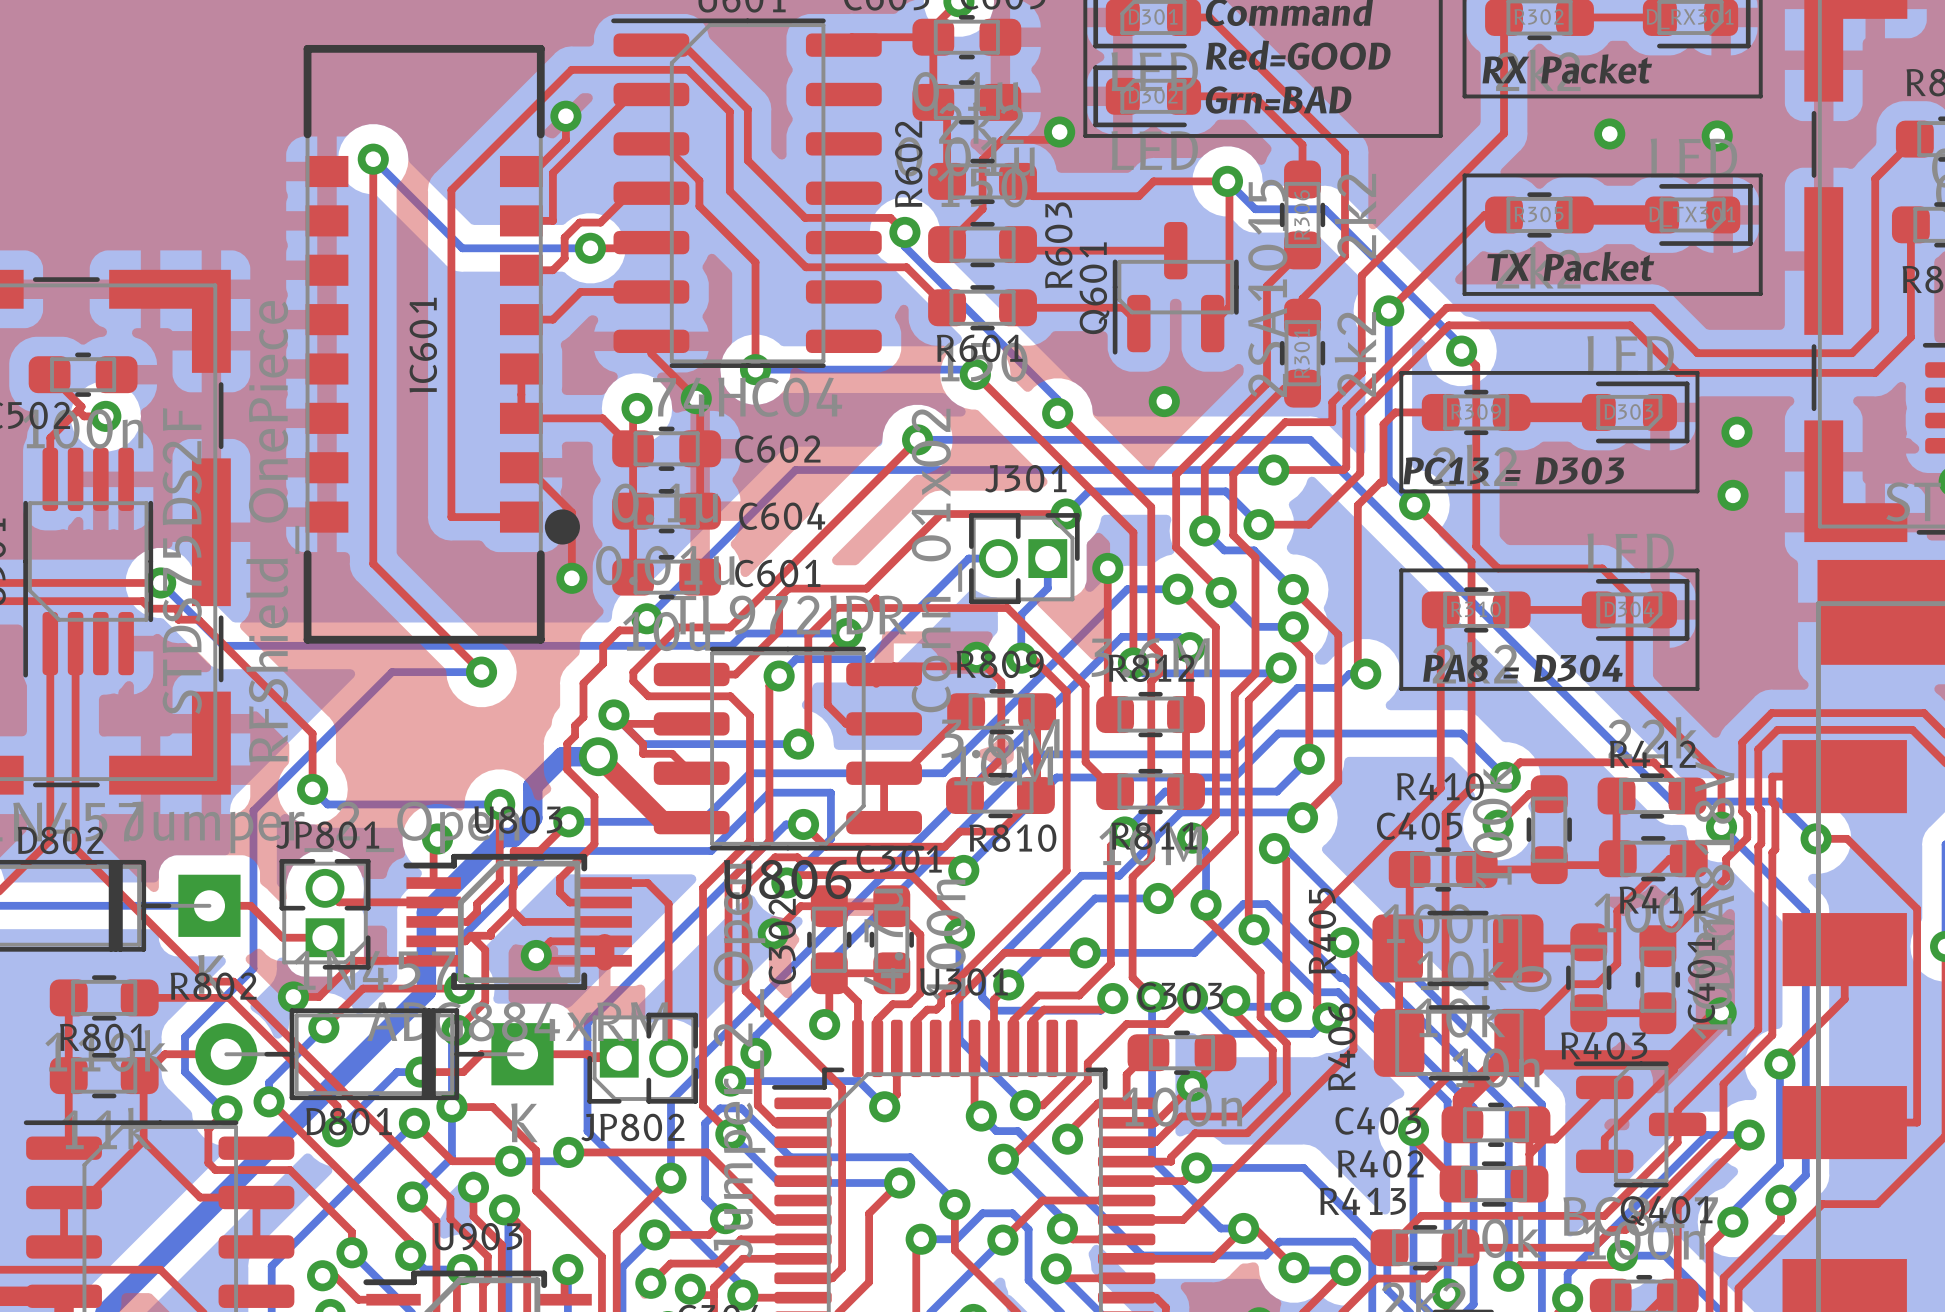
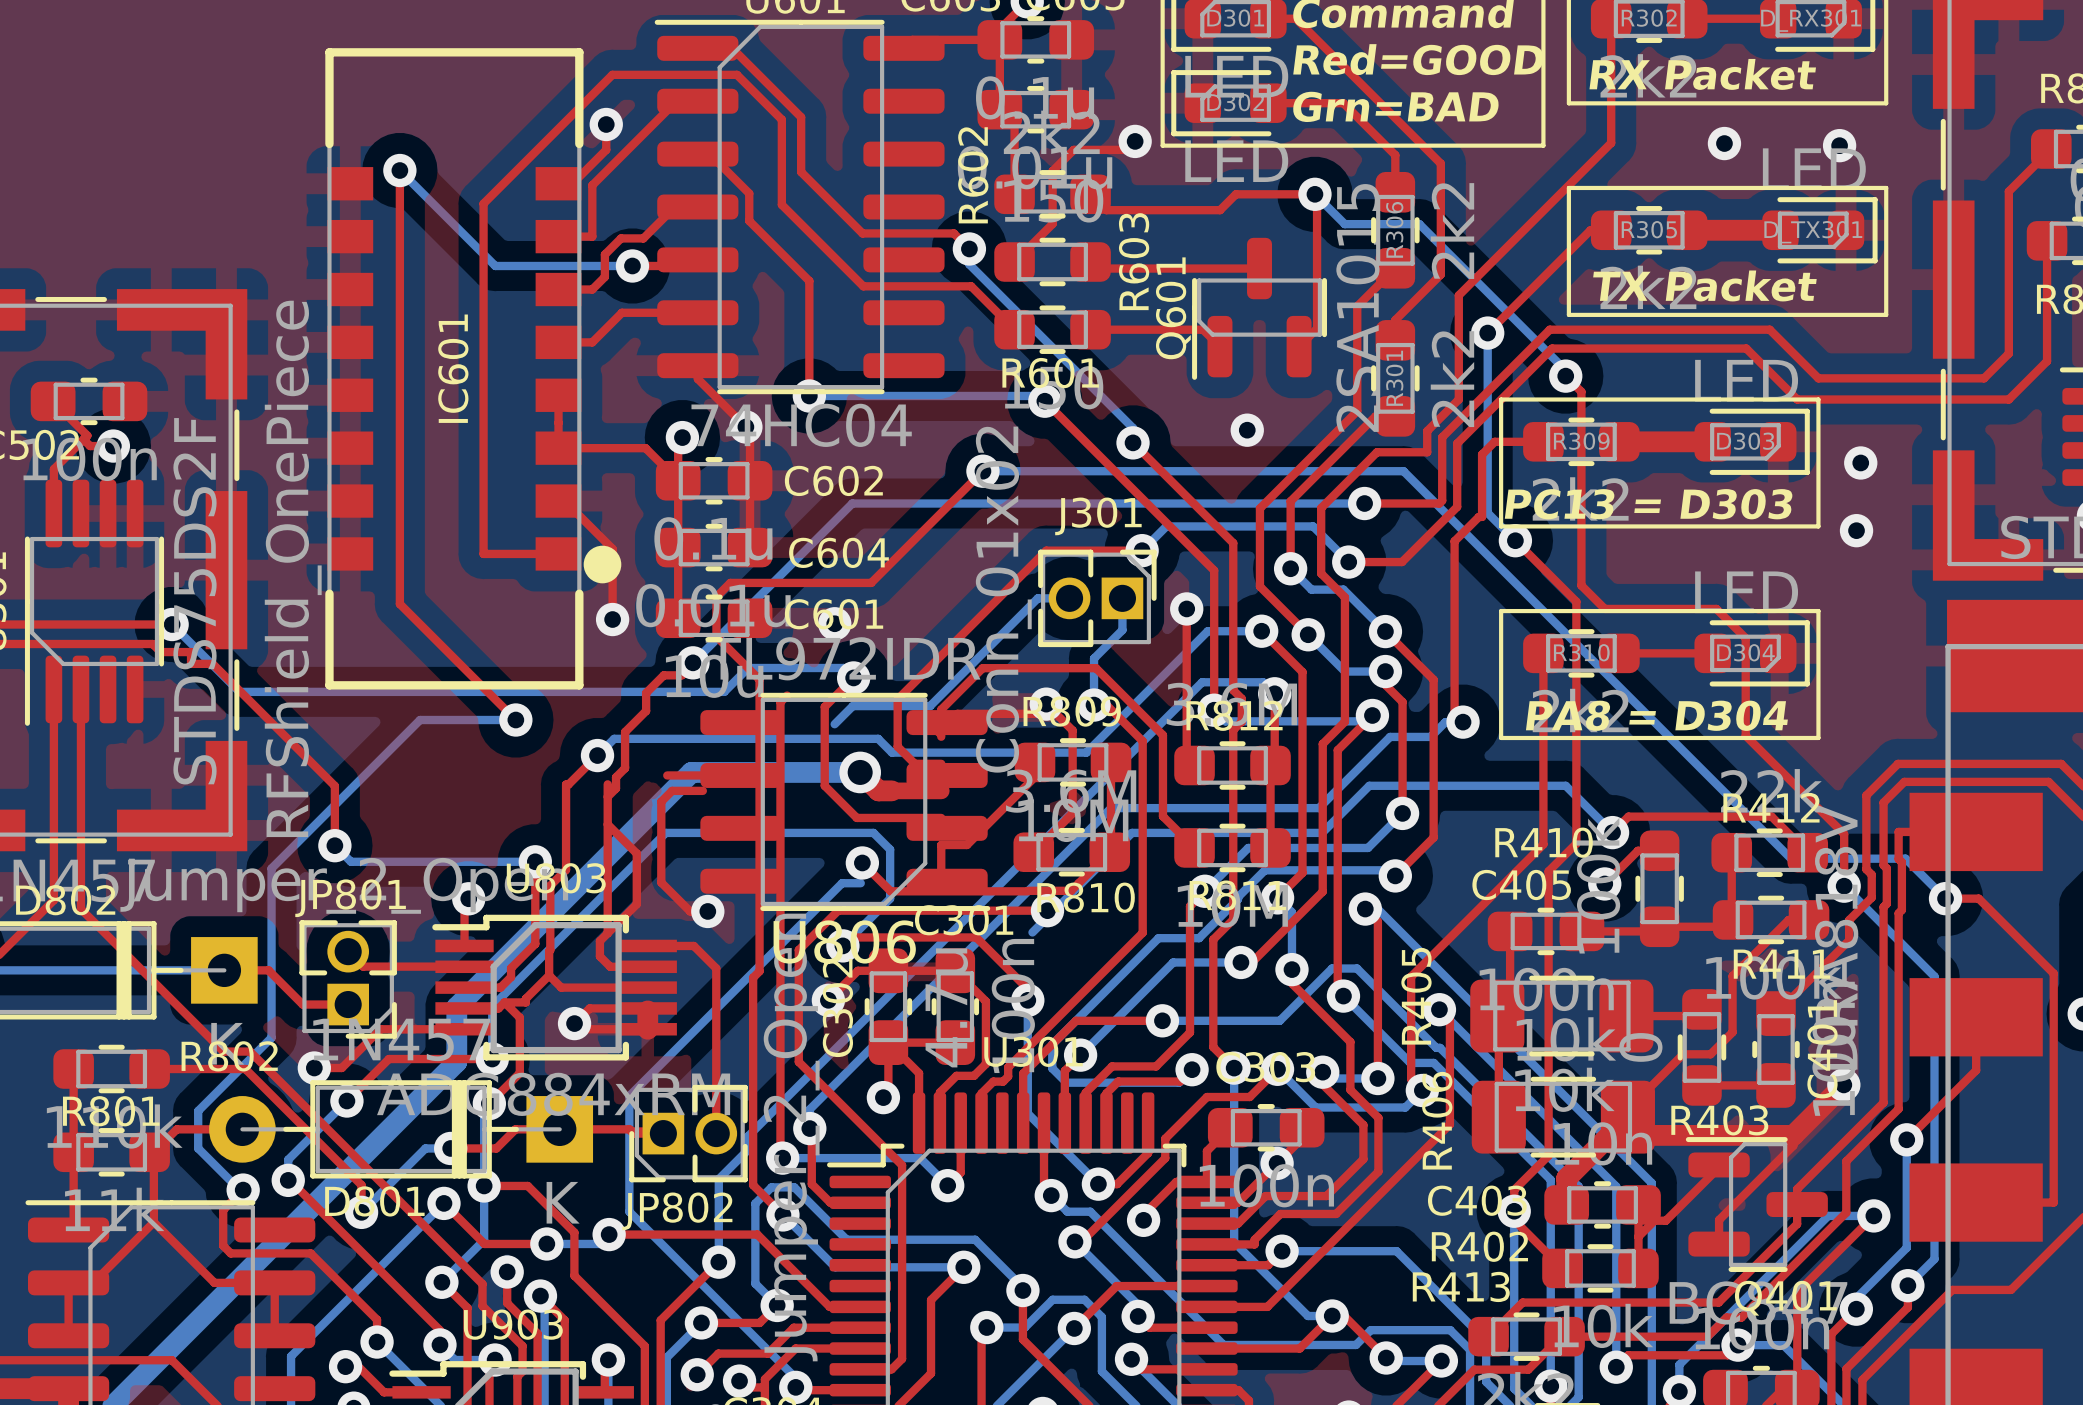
top track: (976, 514) (941, 514) (866, 588) (788, 588) (779, 598) (779, 630) (735, 674) (691, 674) -> (1046, 550) (897, 699) (897, 746) (914, 763) (941, 763)
top track: (813, 544) (729, 627) (678, 627) (633, 672) (633, 681) (648, 696) (730, 696) (749, 715) (749, 840) (703, 887) (703, 912) -> (871, 582) (730, 582) (716, 596) (716, 636) (759, 679) (759, 971) (753, 977)
via: none -> (834, 623)
top track: (876, 598) (876, 608) (1007, 608) (1023, 623) -> (941, 736) (941, 709) (982, 668) (1095, 668)
top track: (876, 598) (867, 607) (836, 607) (808, 636) (808, 734) (798, 744) -> none
top track: none -> (853, 677) (824, 706) (824, 785) (856, 817) (941, 817)
via: none -> (853, 677)
top track: (847, 633) (827, 652) (827, 705) (846, 723) (884, 723) -> none
bottom track: (847, 633) (743, 633) (731, 645) (676, 645) -> (853, 677) (843, 668) (748, 668) (724, 691)
via: (847, 633) -> none
top track: (779, 676) (769, 685) (769, 841) (728, 882) -> (787, 695) (780, 702) (780, 945)
via: (779, 676) -> none
bottom track: (1014, 702) (943, 773) (749, 773) (701, 821) (568, 821) -> (1086, 752) (892, 752) (878, 738) (614, 738) (597, 755)
top track: (966, 711) (904, 773) (884, 773) (884, 822) -> (1035, 762) (1035, 776) (966, 845) (941, 845) (941, 872)
top track: (613, 714) (643, 744) (643, 753) (672, 753) (691, 773) -> none
bottom track: (613, 714) (643, 744) (798, 744) -> none
via position: (613, 714) -> (597, 755)
top track: none -> (860, 772) (878, 790) (941, 790)
top track: none -> (702, 790) (672, 790) (661, 801) (661, 882) (690, 911) (707, 911)
via: (798, 744) -> none
top track: (598, 756) (664, 822) (691, 822) -> none
bottom track: (598, 756) (562, 756) (532, 786) (532, 818) (513, 837) (501, 837) (426, 912) (426, 940) -> (860, 772) (691, 772) (456, 1007)
via position: (598, 756) -> (860, 772)
bottom track: (830, 792) (769, 792) (711, 851) (548, 851) -> (889, 849) (873, 832) (665, 832) (587, 911)
top track: (568, 821) (539, 851) (513, 851) -> (597, 755) (568, 784) (566, 784) (566, 869) (550, 885) (550, 911)
via: (568, 821) -> none
top track: (803, 824) (825, 846) (944, 846) (959, 831) -> (862, 862) (890, 891) (1027, 891)
via position: (803, 824) -> (862, 862)
via: none -> (707, 911)
top track: (775, 857) (797, 857) (800, 860) (954, 860) (963, 870) -> (830, 918) (838, 910) (1047, 910)
via position: (963, 870) -> (1047, 910)

